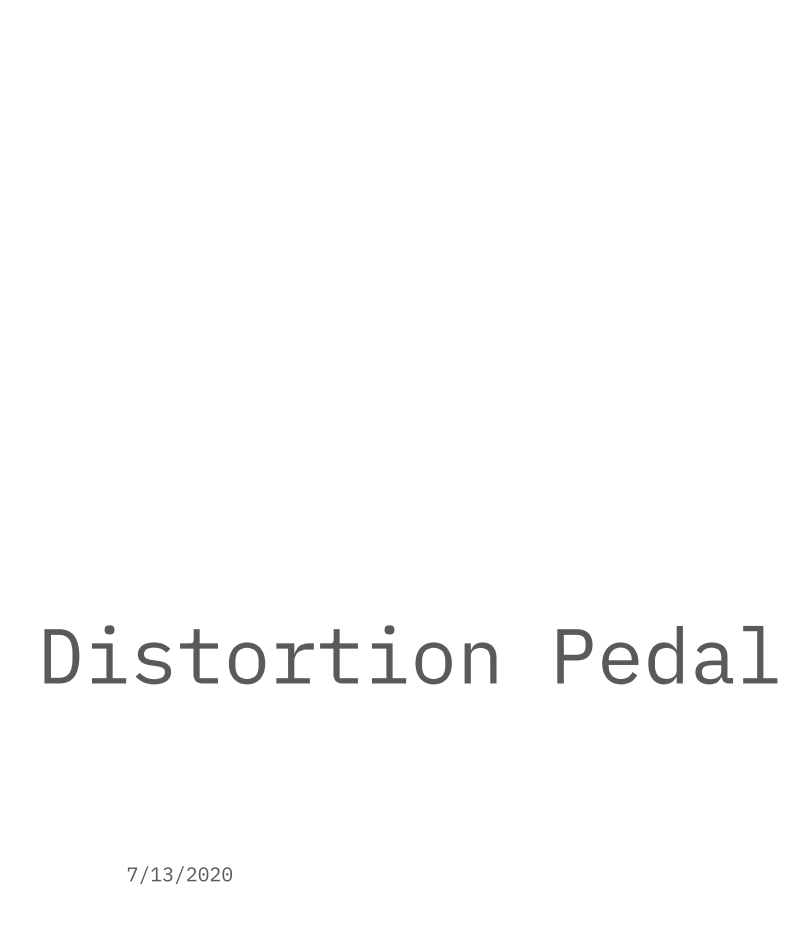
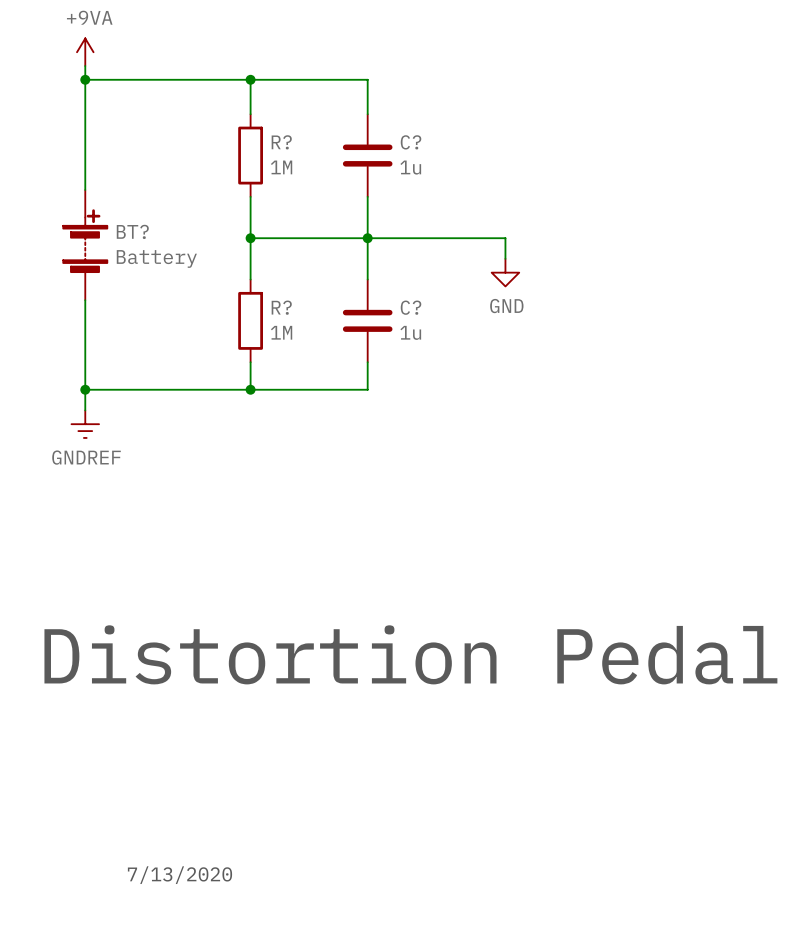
power symbol: none -> +9VA (85, 52)
wire: none -> (85, 66) (85, 190)
wire: none -> (85, 79) (367, 79) (367, 114)
junction: none -> (85, 79)
wire: none -> (250, 79) (250, 114)
junction: none -> (250, 79)
R?: none -> 1M (250, 155)
C?: none -> 1u (367, 155)
wire: none -> (250, 196) (250, 279)
wire: none -> (367, 196) (367, 279)
wire: none -> (250, 238) (505, 238) (505, 258)
junction: none -> (250, 238)
junction: none -> (367, 238)
BT?: none -> Battery (85, 245)
power symbol: none -> GND (505, 272)
wire: none -> (85, 300) (85, 410)
R?: none -> 1M (250, 320)
C?: none -> 1u (367, 320)
wire: none -> (250, 362) (250, 389)
wire: none -> (367, 362) (367, 389) (85, 389)
junction: none -> (85, 389)
junction: none -> (250, 389)
power symbol: none -> GNDREF (85, 424)

